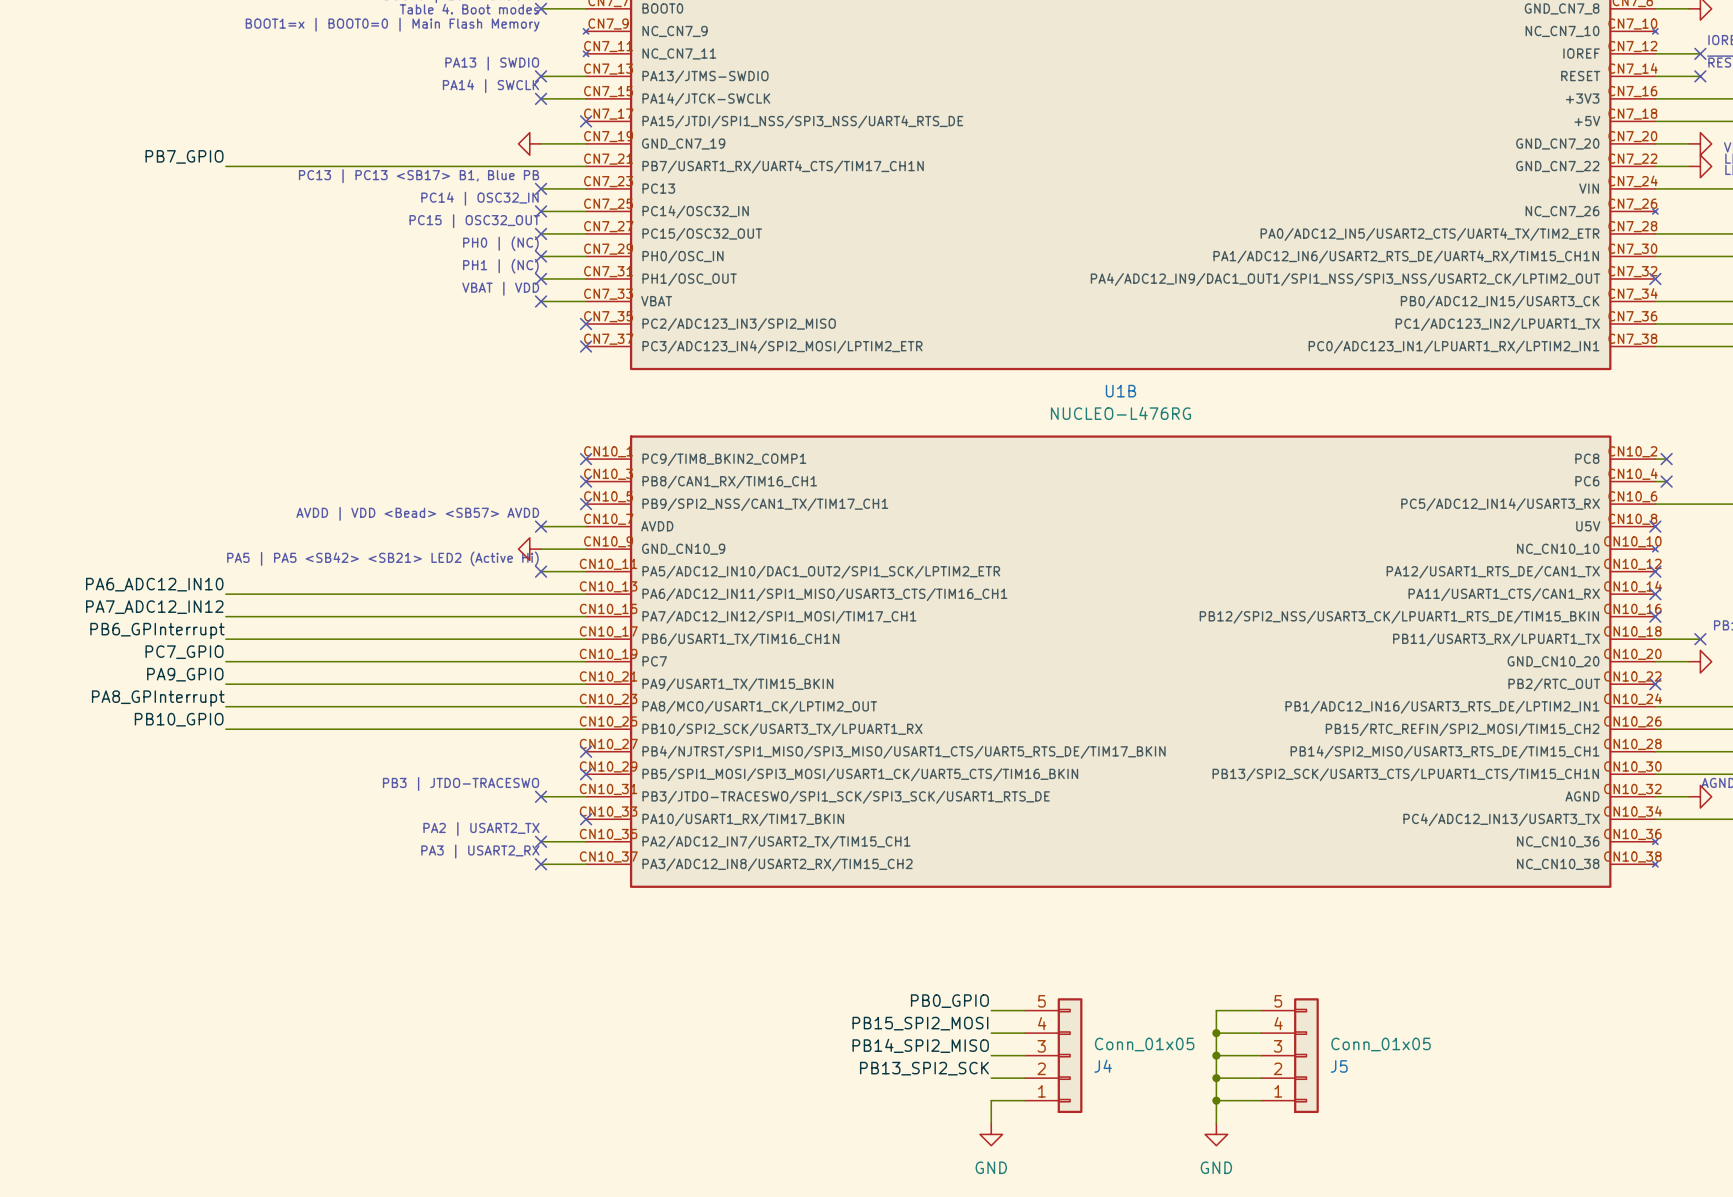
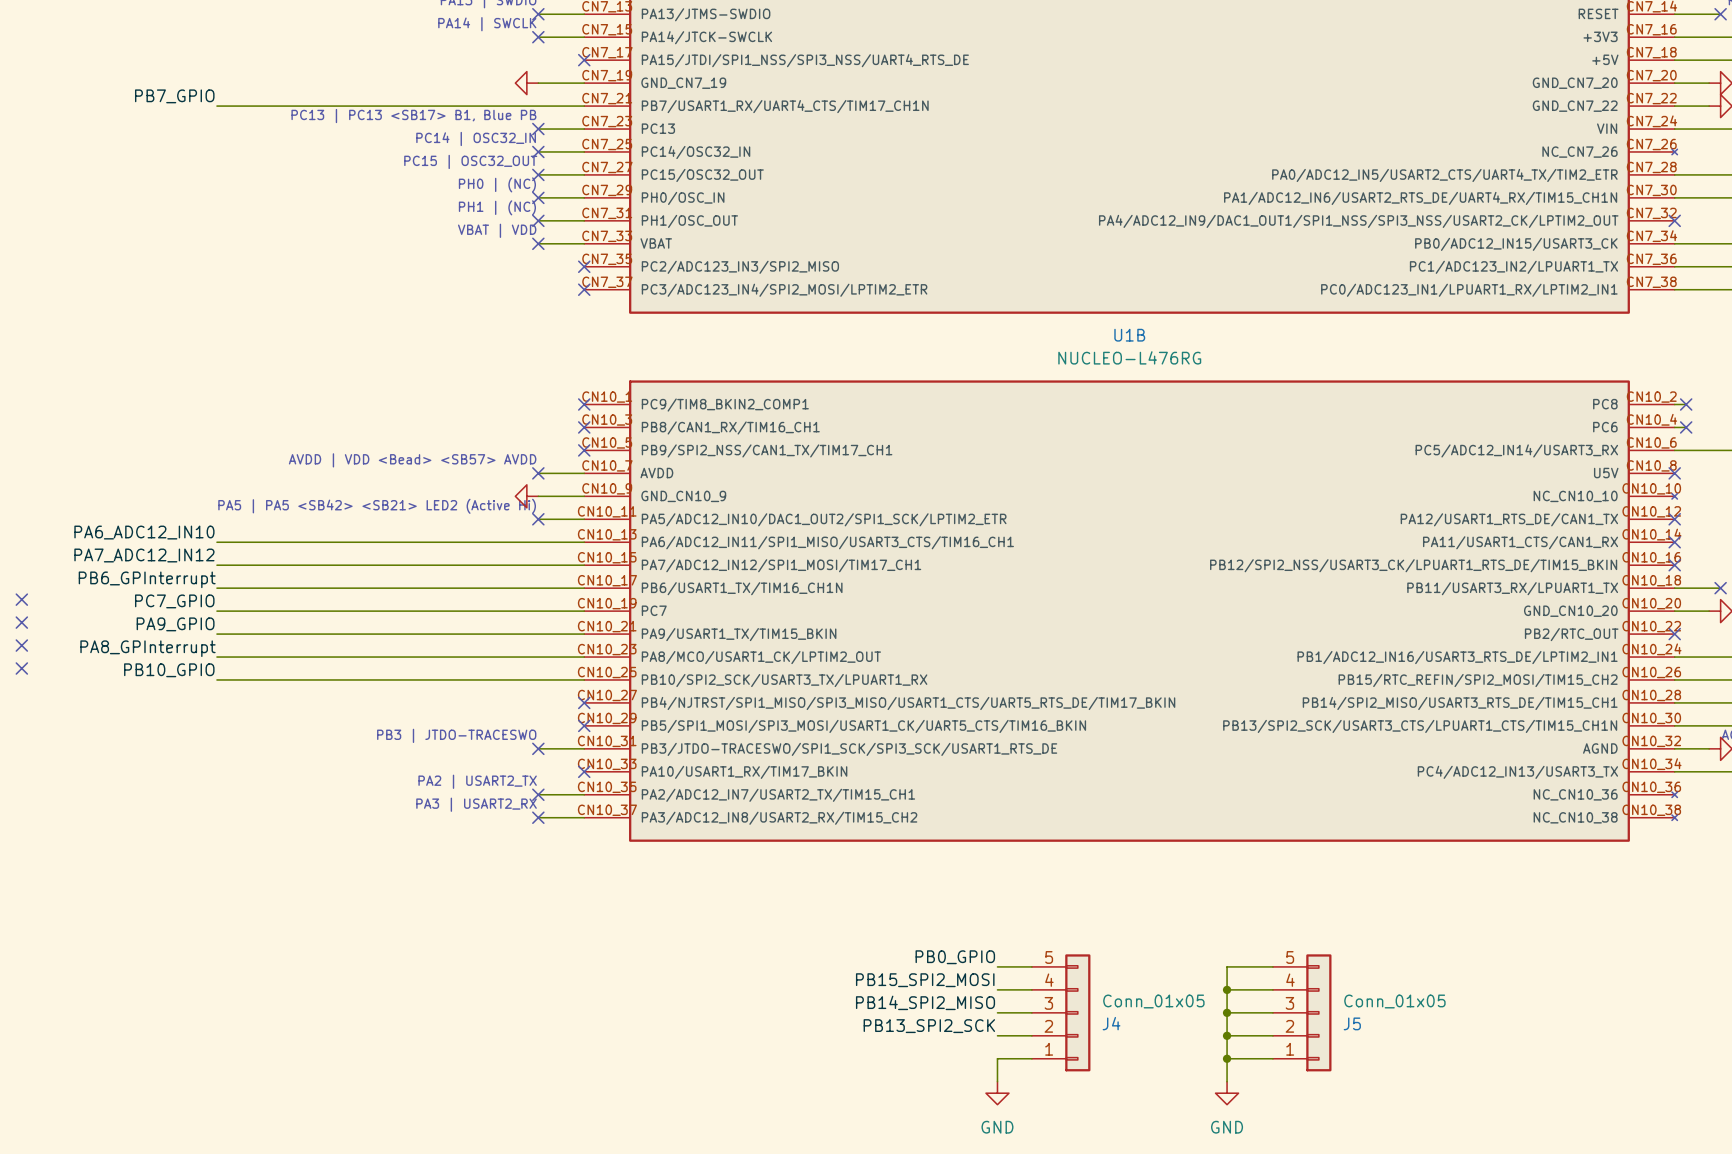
no-connect mark: none -> (21, 599)
no-connect mark: none -> (21, 622)
no-connect mark: none -> (21, 645)
no-connect mark: none -> (21, 668)

